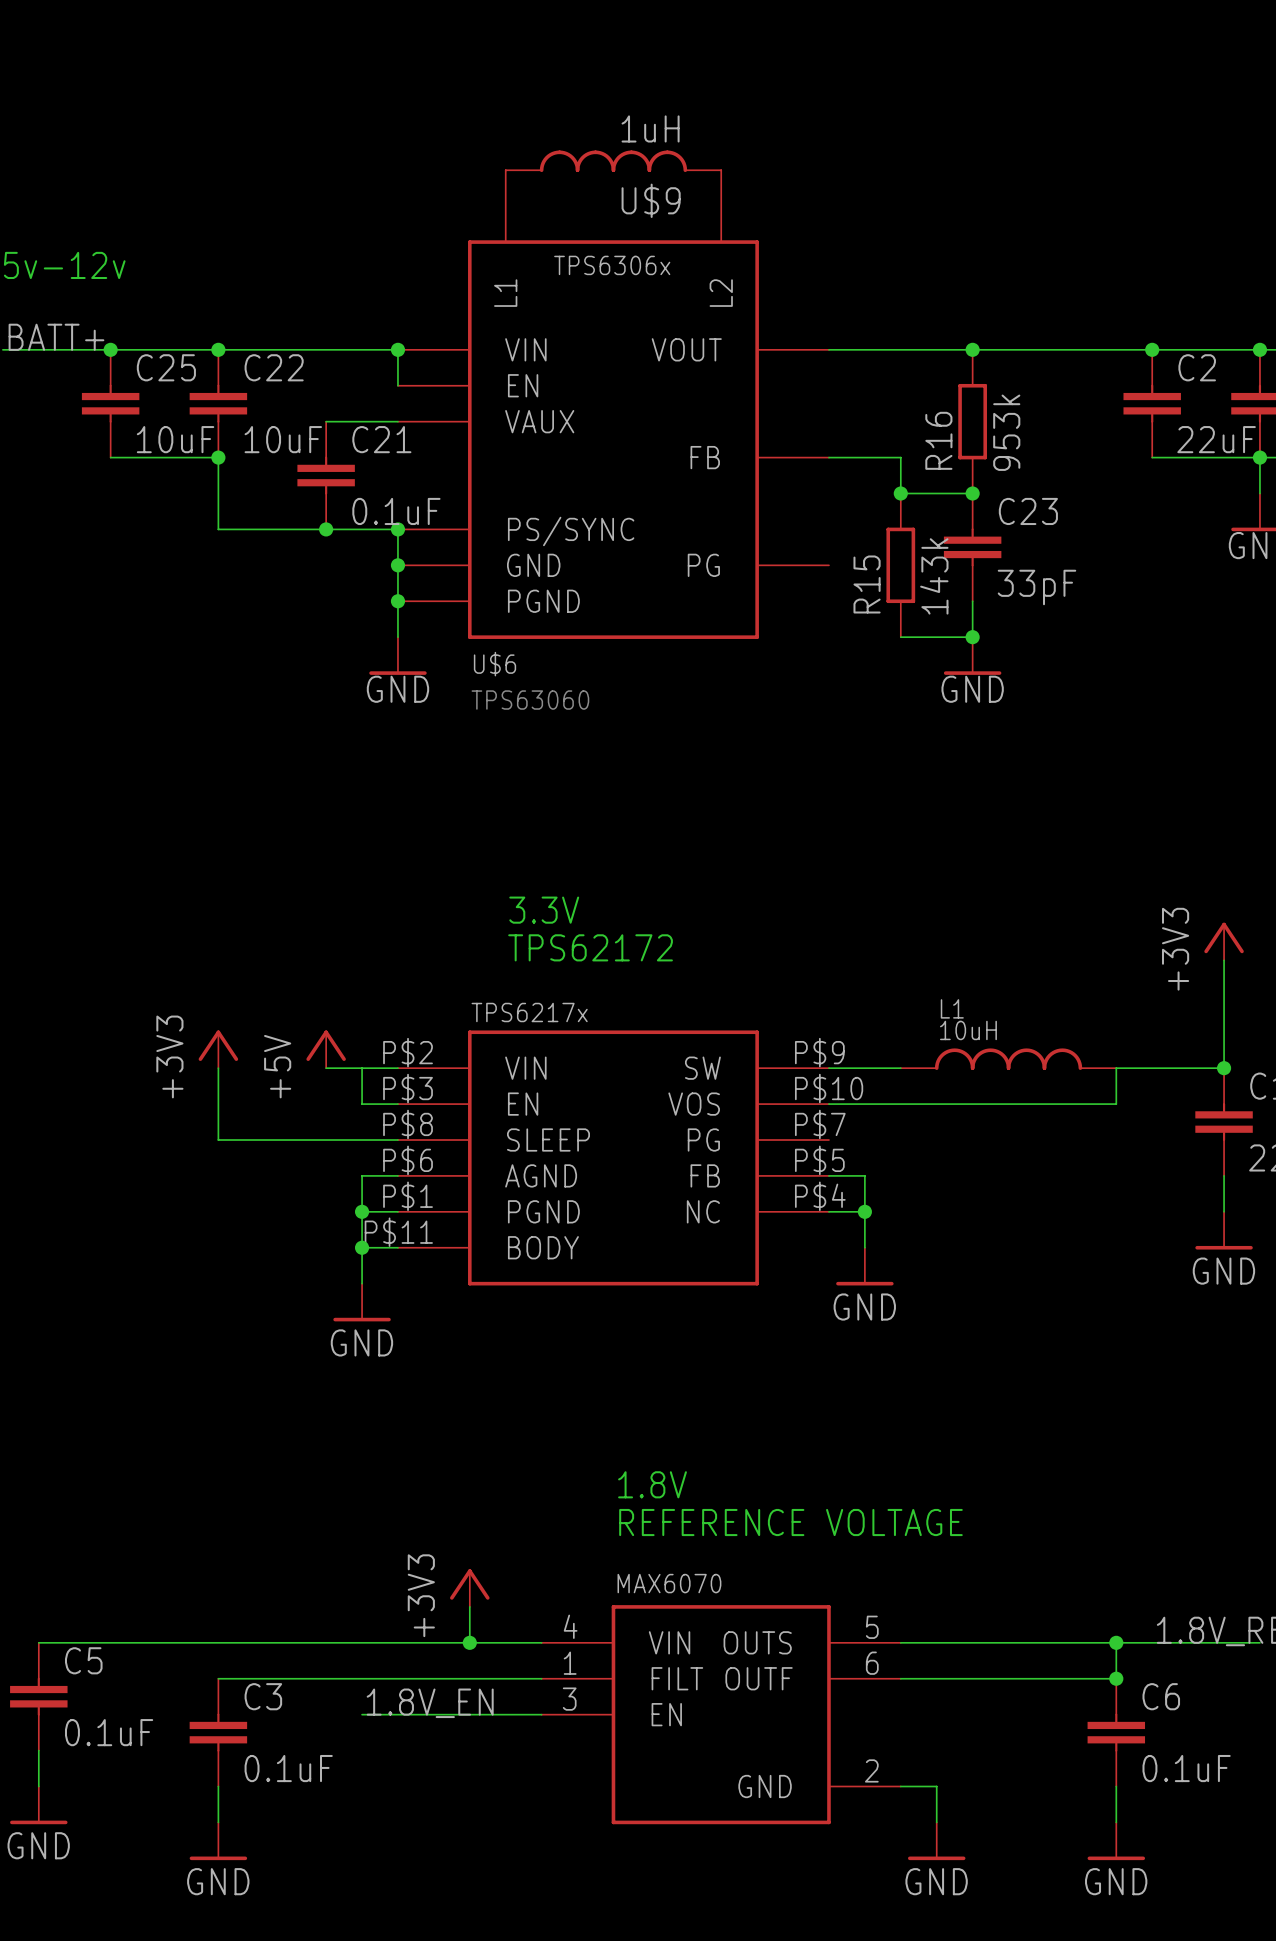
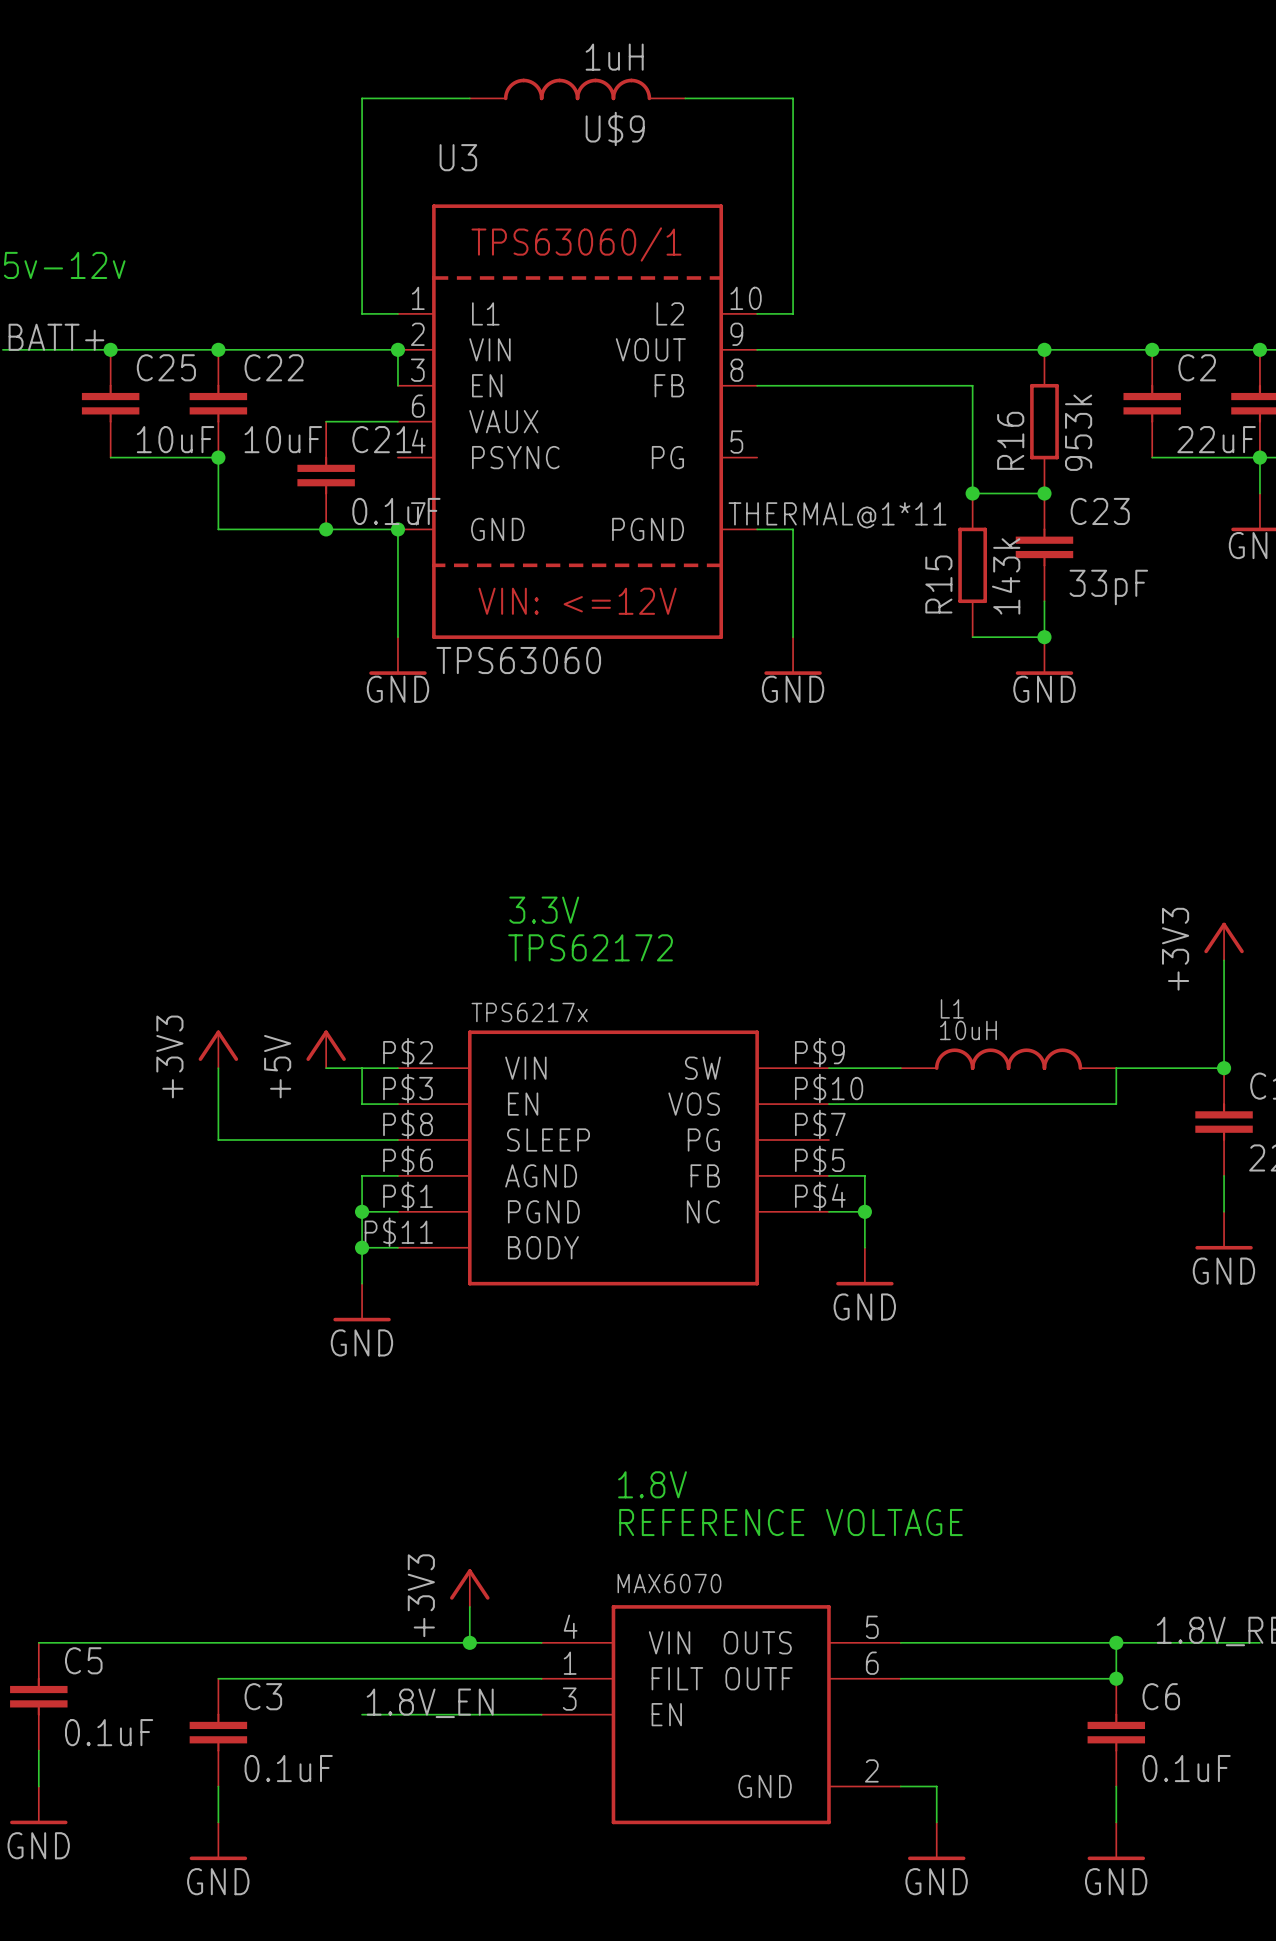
wire: none -> (469, 98) (362, 98) (362, 313) (397, 313)
wire: none -> (685, 98) (793, 98) (793, 313) (757, 313)
U$9 position: (613, 161) -> (577, 89)
junction position: (972, 349) -> (1044, 349)
wire: none -> (757, 385) (972, 385) (972, 493) (1044, 493)
U$6: TPS63060 (613, 404) -> none
U3: none -> TPS63060 (577, 421)
R16 position: (972, 421) -> (1044, 421)
wire: (828, 457) (900, 457) (900, 493) (972, 493) -> none
junction: (900, 493) -> none
junction: none -> (1044, 493)
wire: none -> (757, 529) (793, 529) (793, 637)
C23 position: (972, 547) -> (1044, 547)
junction: (397, 565) -> none
R15 position: (900, 565) -> (972, 565)
junction: (397, 601) -> none
wire: (972, 601) (972, 637) (900, 637) -> (1044, 601) (1044, 637) (972, 637)
junction position: (972, 637) -> (1044, 637)
power symbol: none -> GND (793, 656)
power symbol position: GND (972, 656) -> GND (1044, 656)

